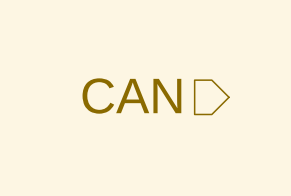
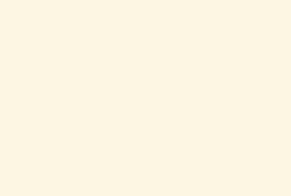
hierarchical label: CAN (131, 96) -> none

